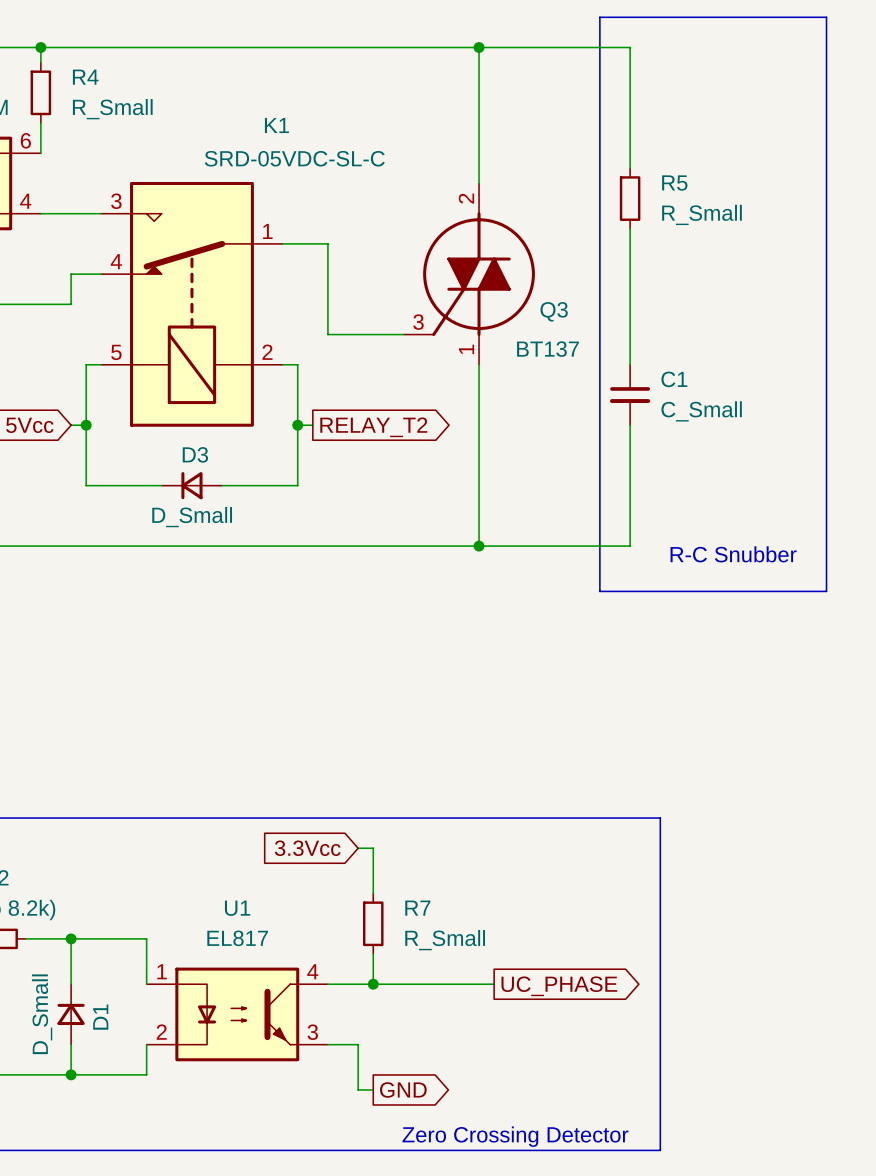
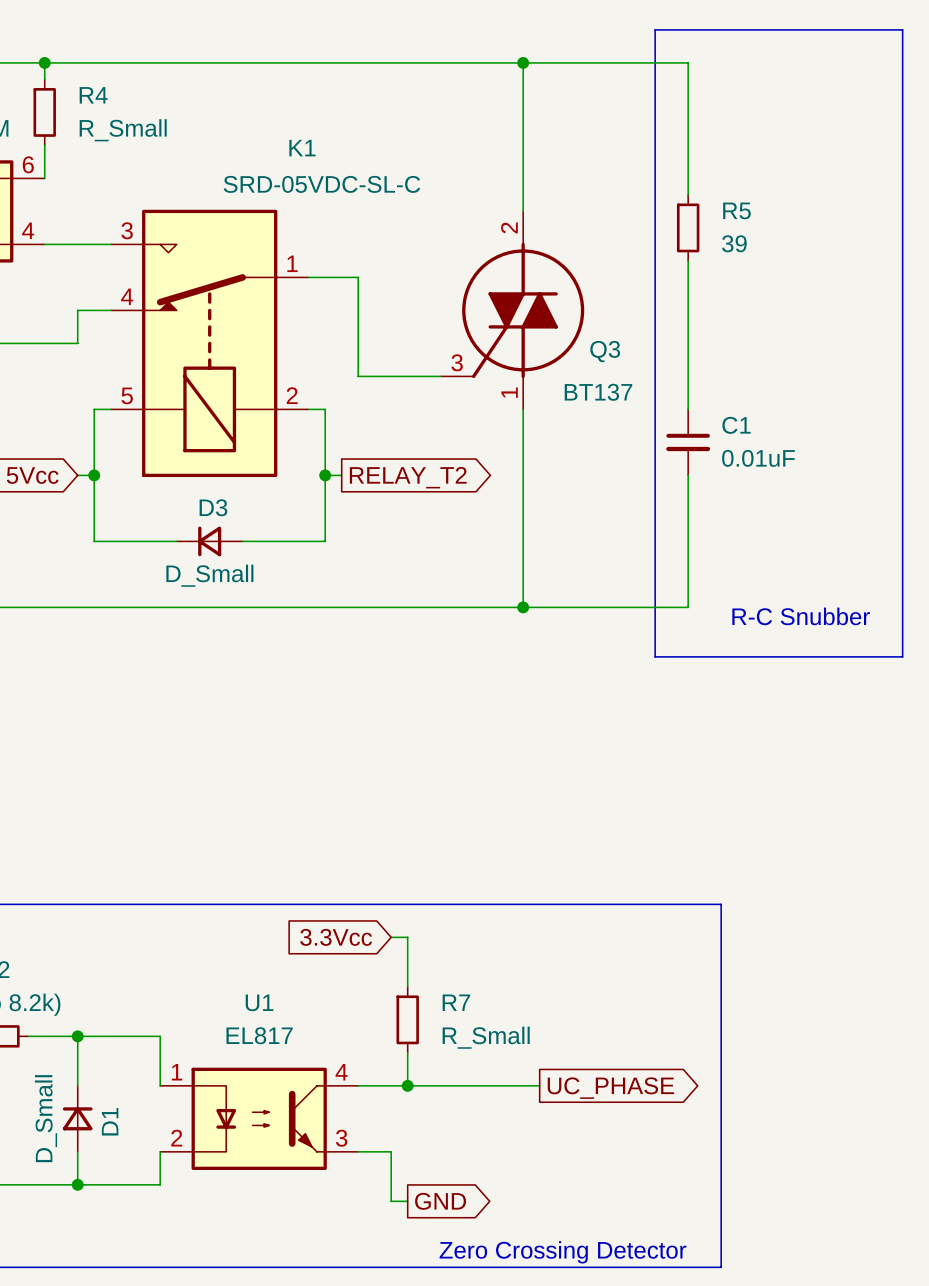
R5 value: R_Small (701, 214) -> 39 (734, 243)
C1 value: C_Small (701, 411) -> 0.01uF (758, 458)

